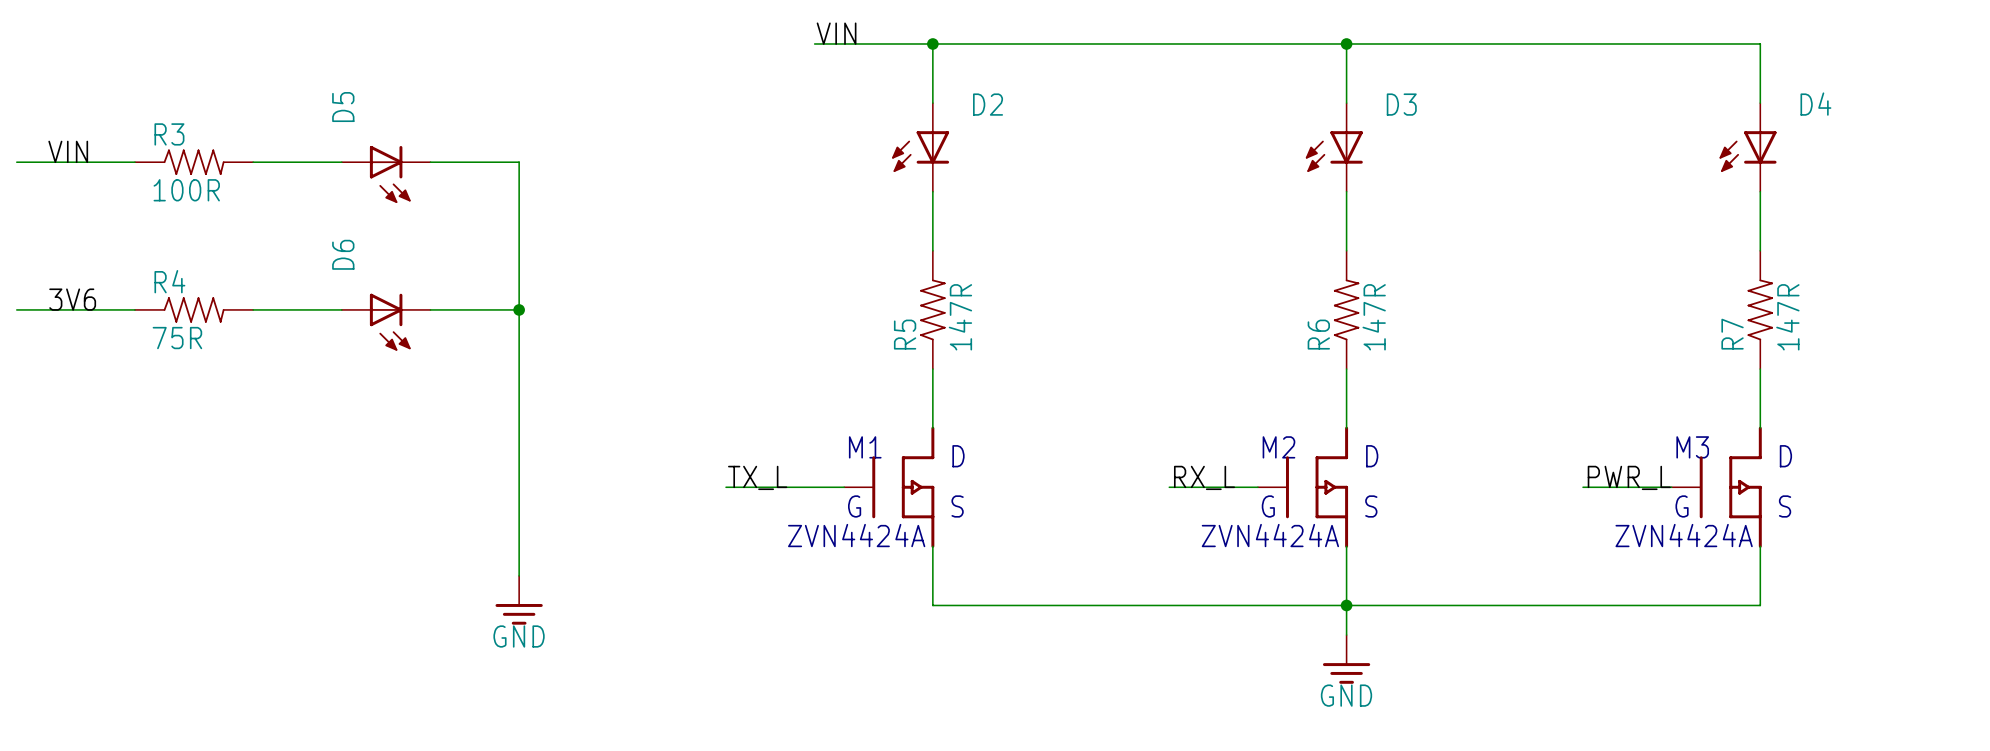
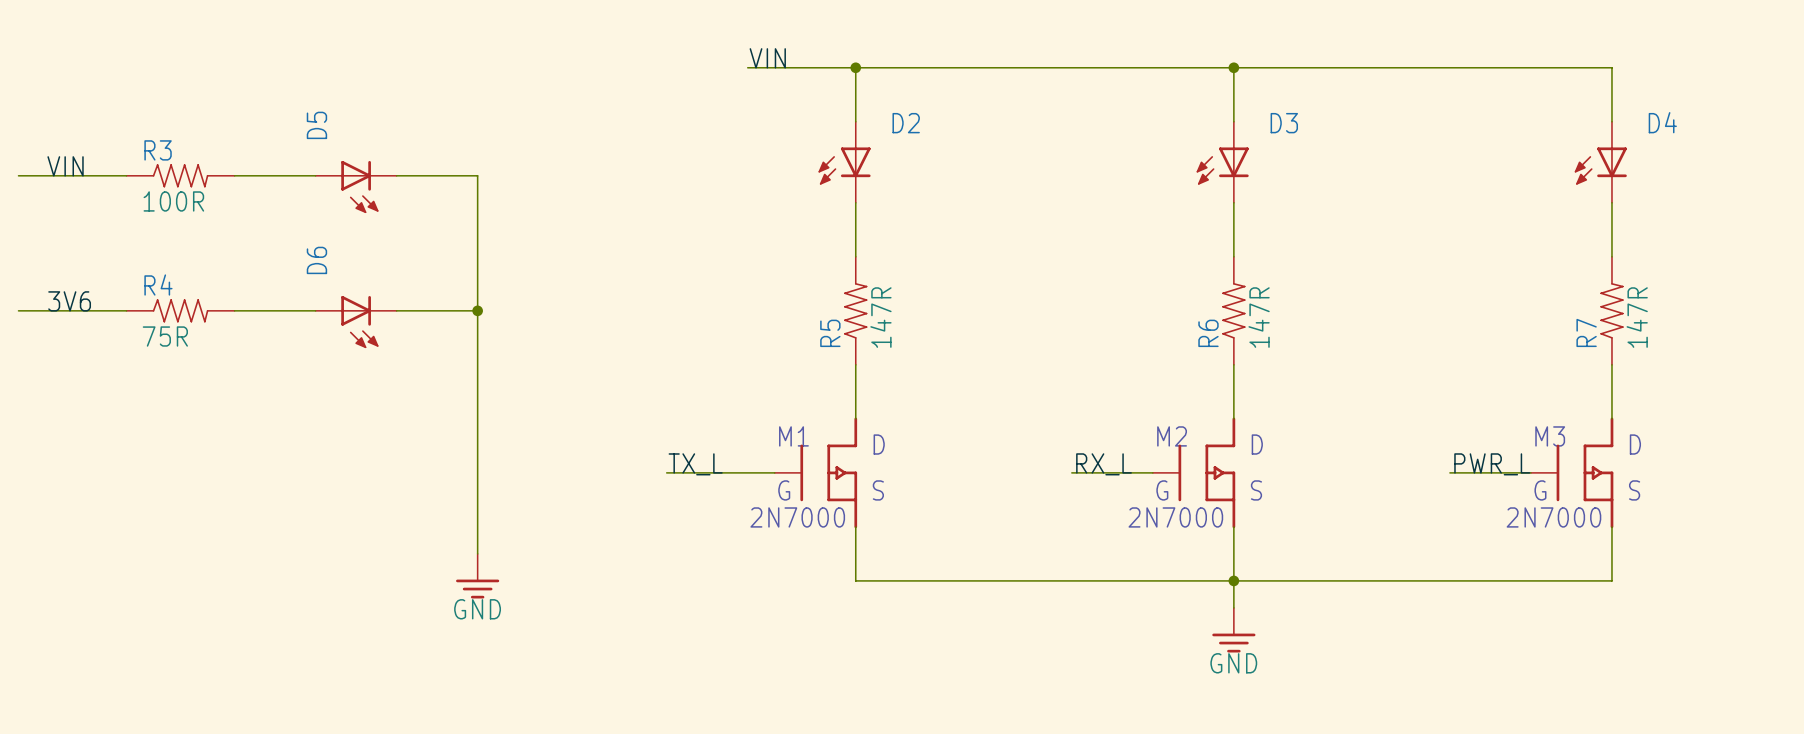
M1 value: ZVN4424A (856, 535) -> 2N7000 (797, 517)
M2 value: ZVN4424A (1270, 535) -> 2N7000 (1175, 517)
M3 value: ZVN4424A (1684, 535) -> 2N7000 (1553, 517)

